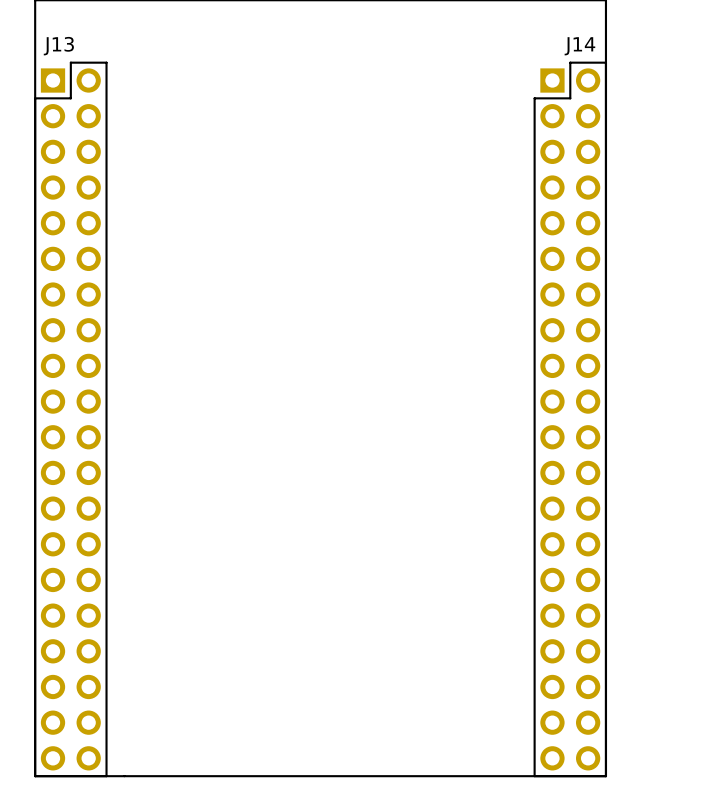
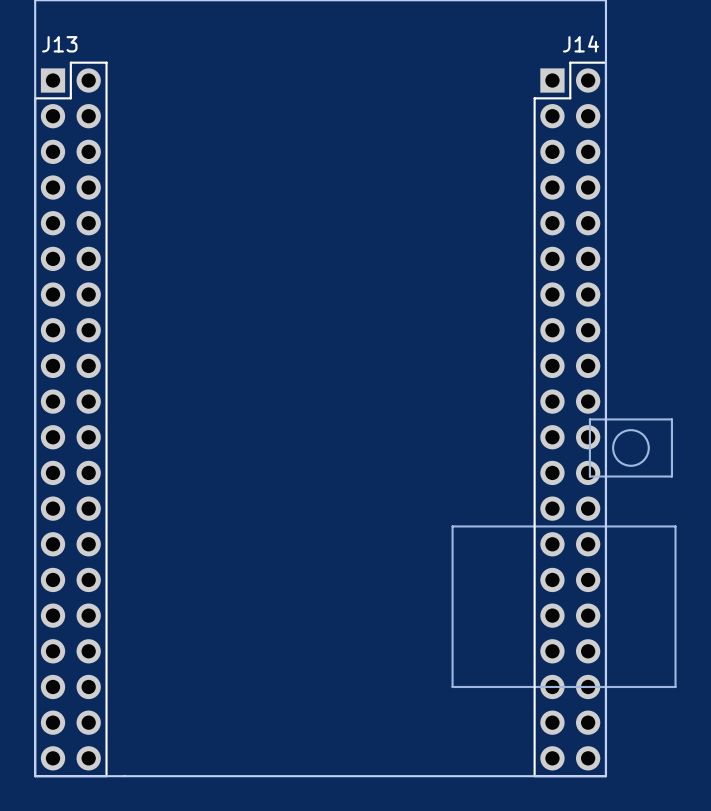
line: none -> (589, 419) (589, 476) (671, 476) (671, 419) (589, 419)
drawing: none -> [612, 429, 650, 467]
line: none -> (452, 526) (452, 686) (675, 686) (675, 526) (452, 526)

